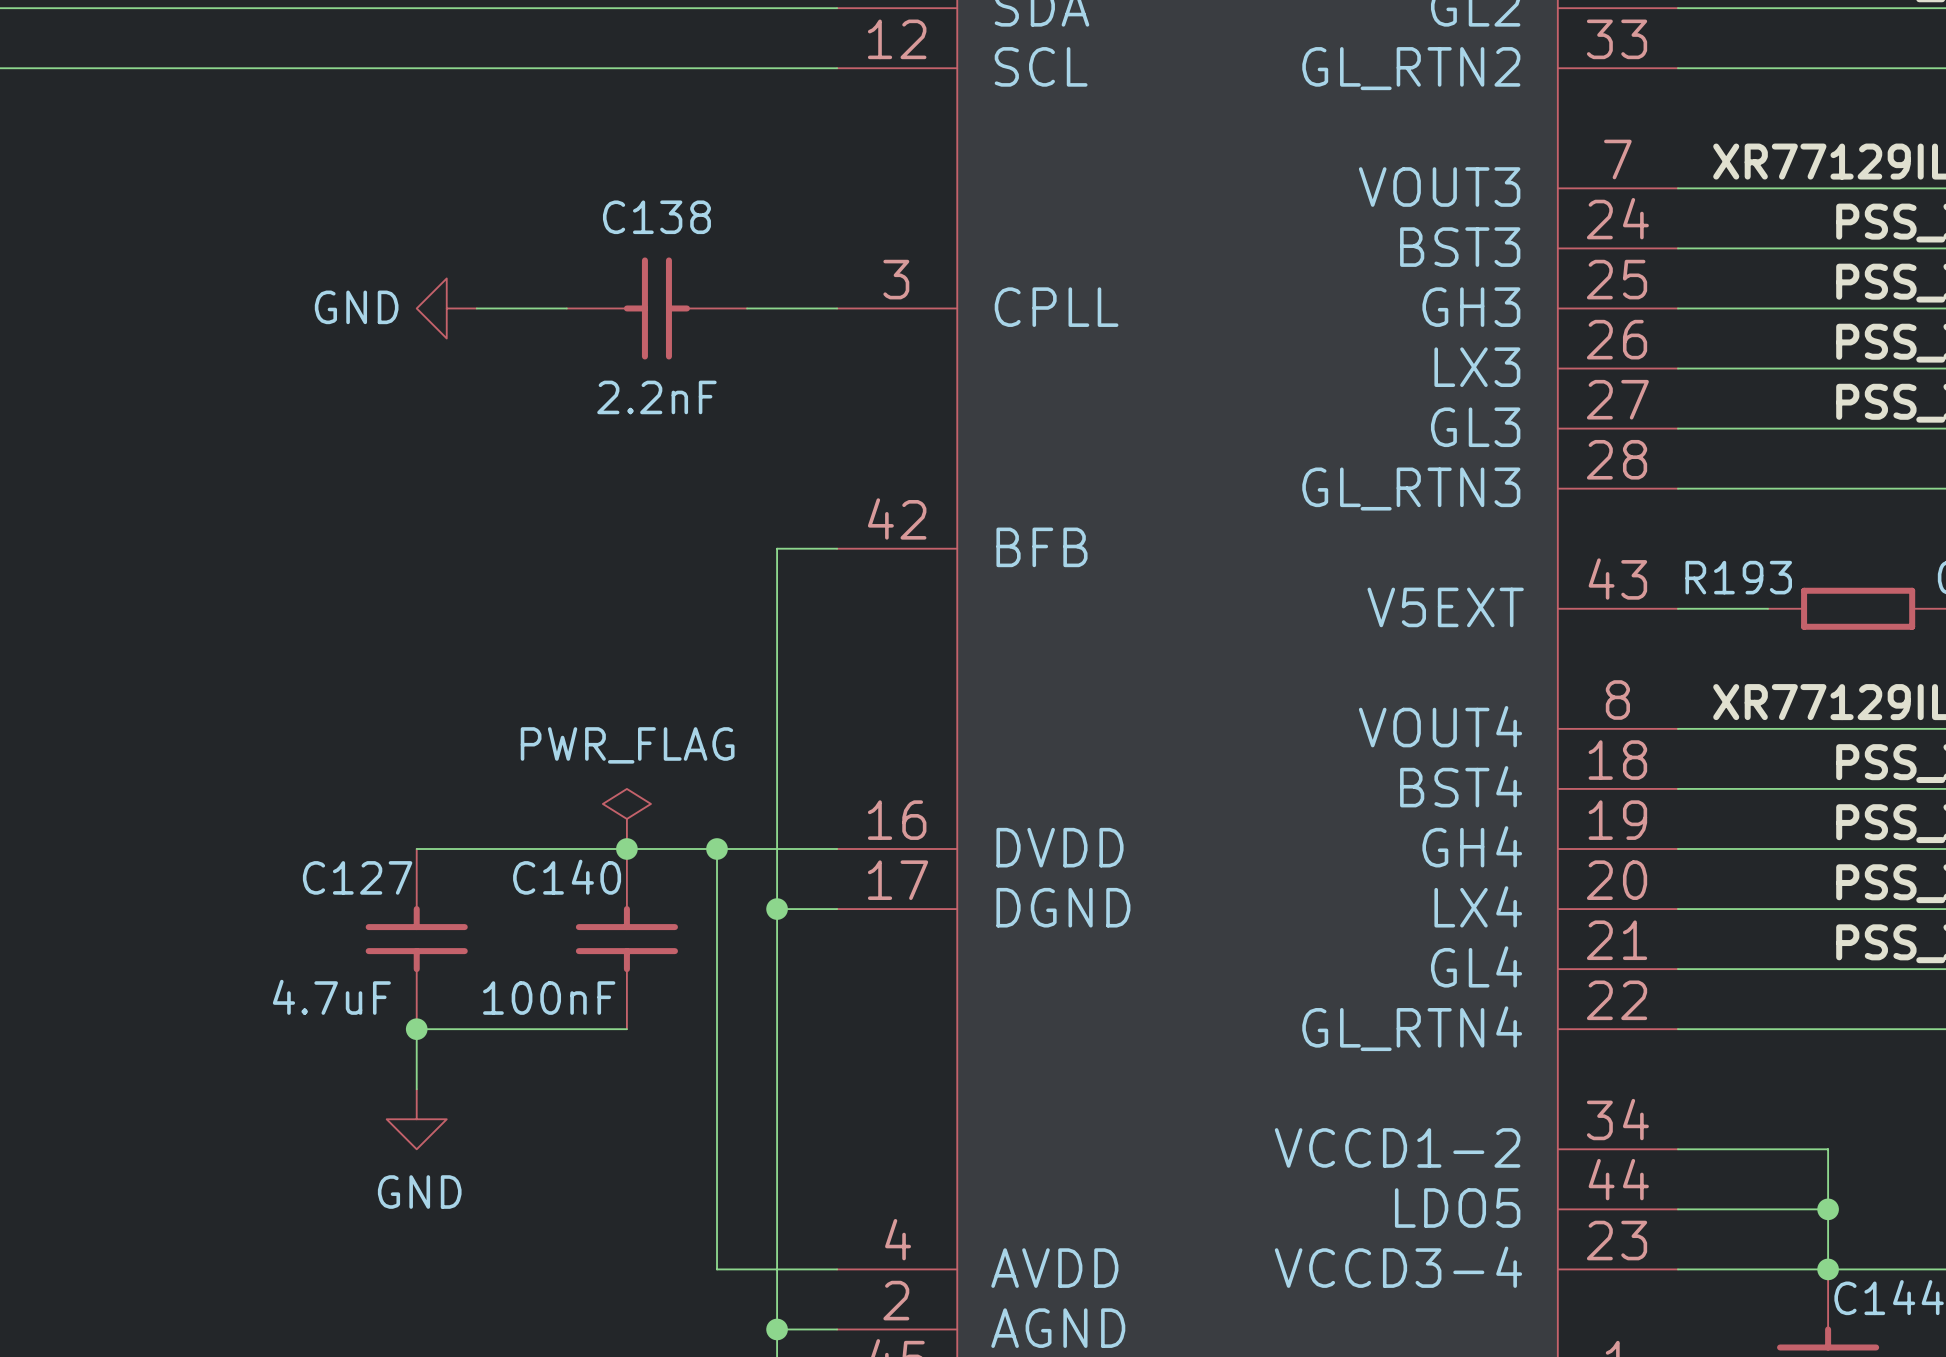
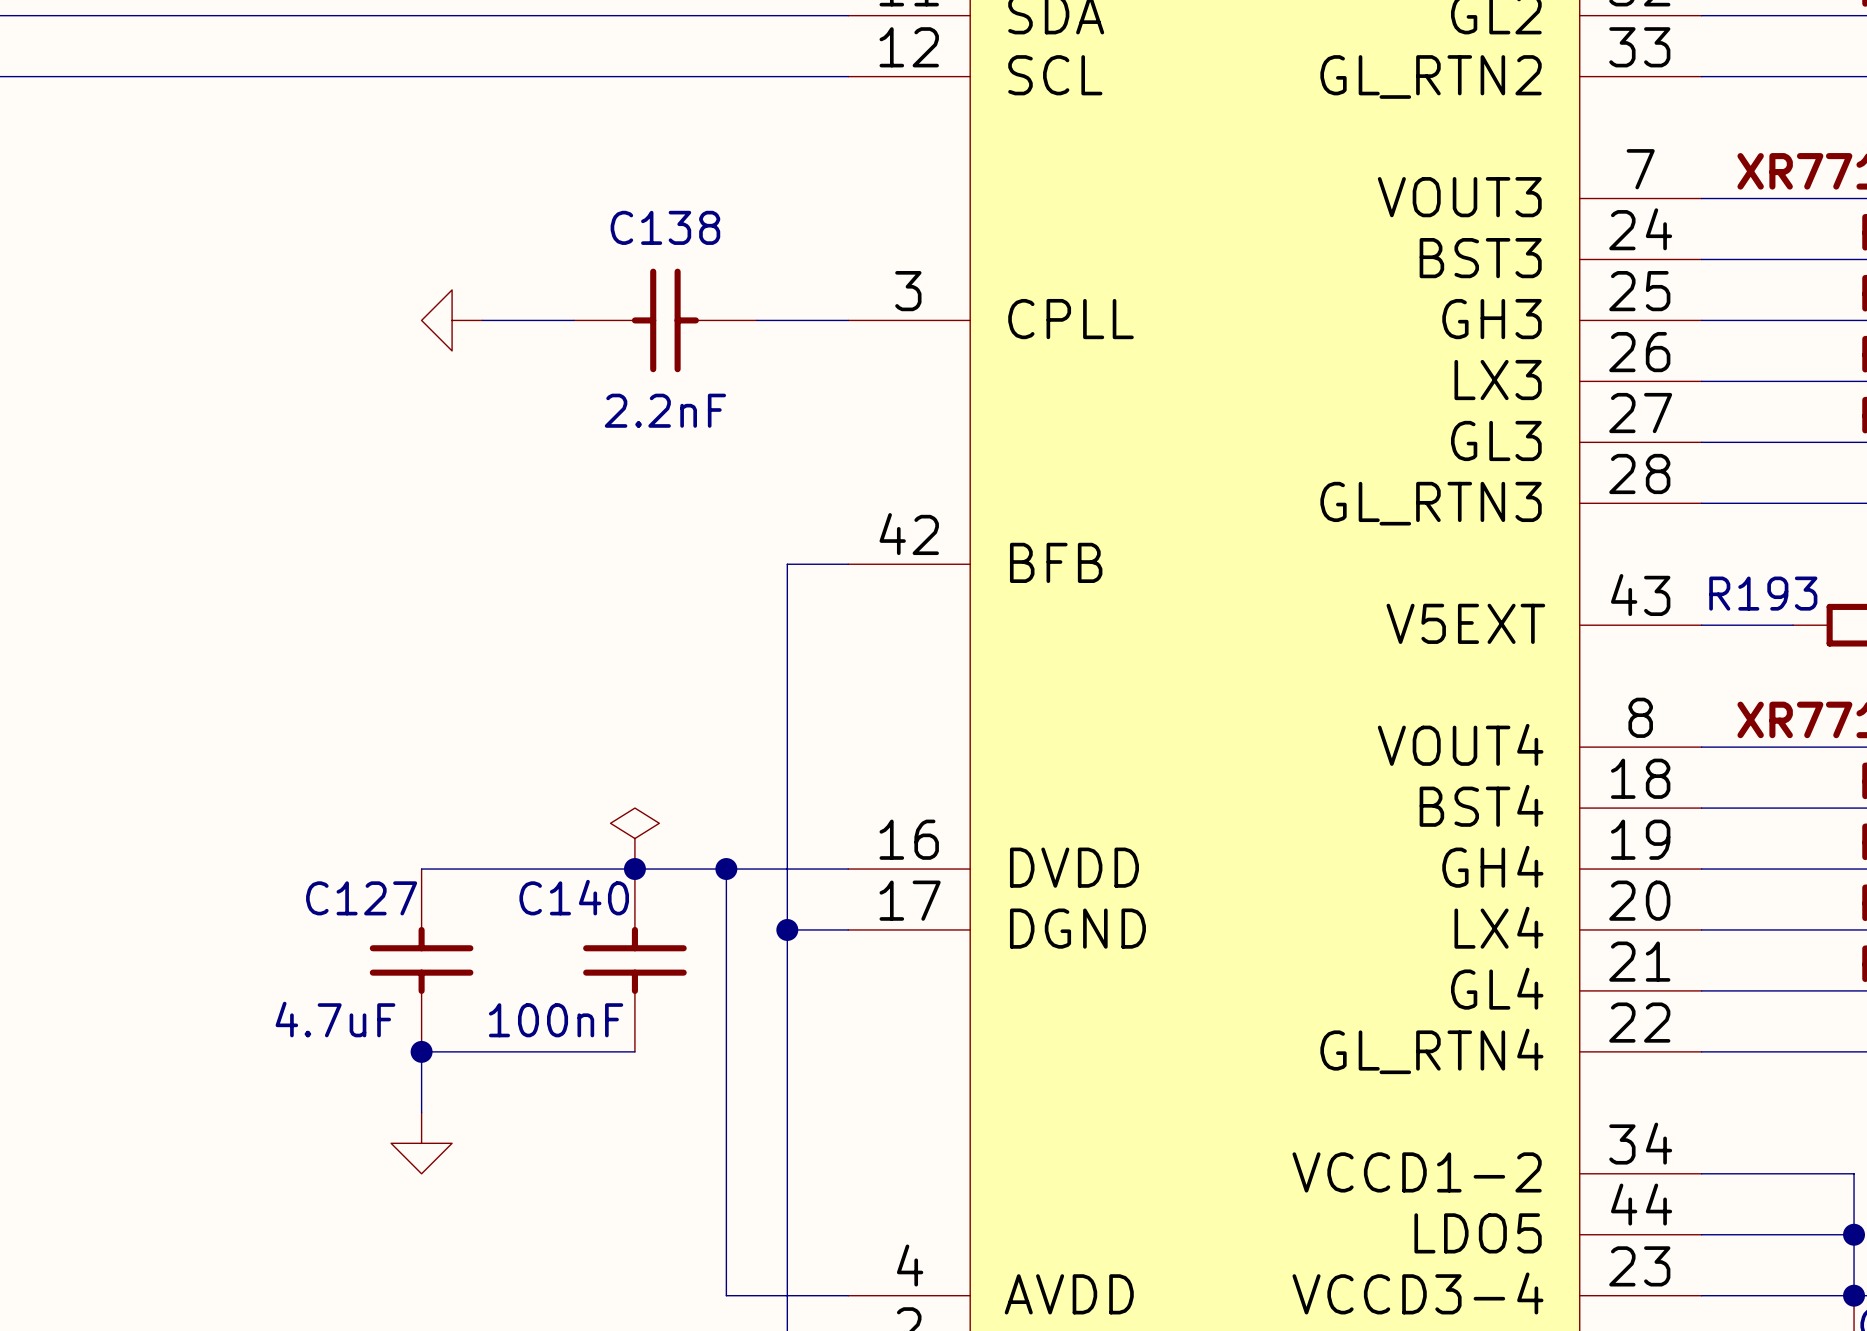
power symbol text: GND (356, 307) -> none
power symbol text: PWR_FLAG (627, 745) -> none
power symbol text: GND (419, 1192) -> none

